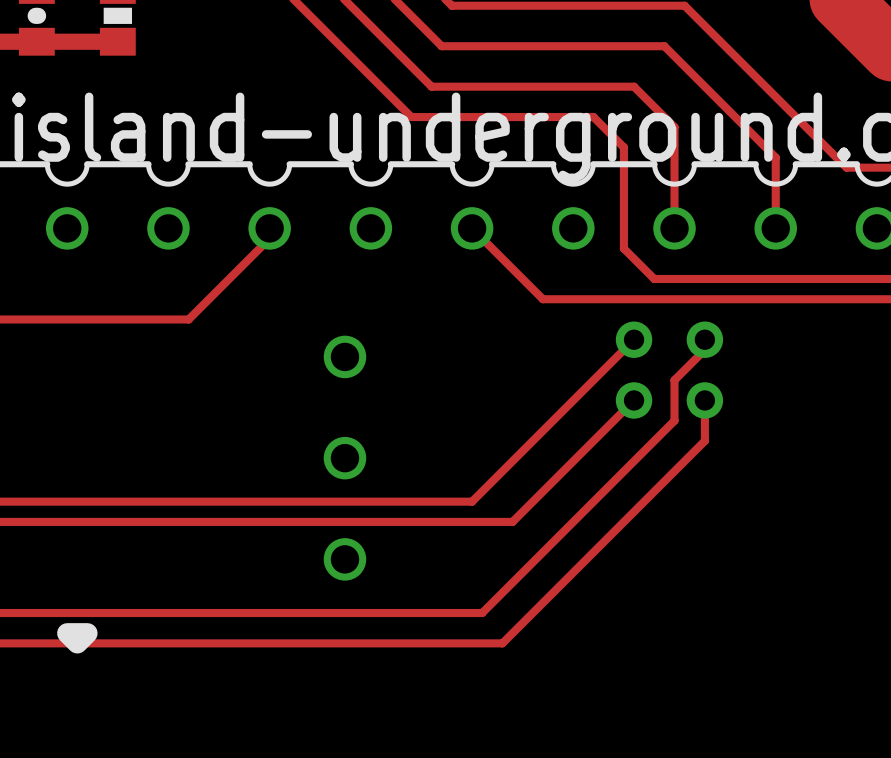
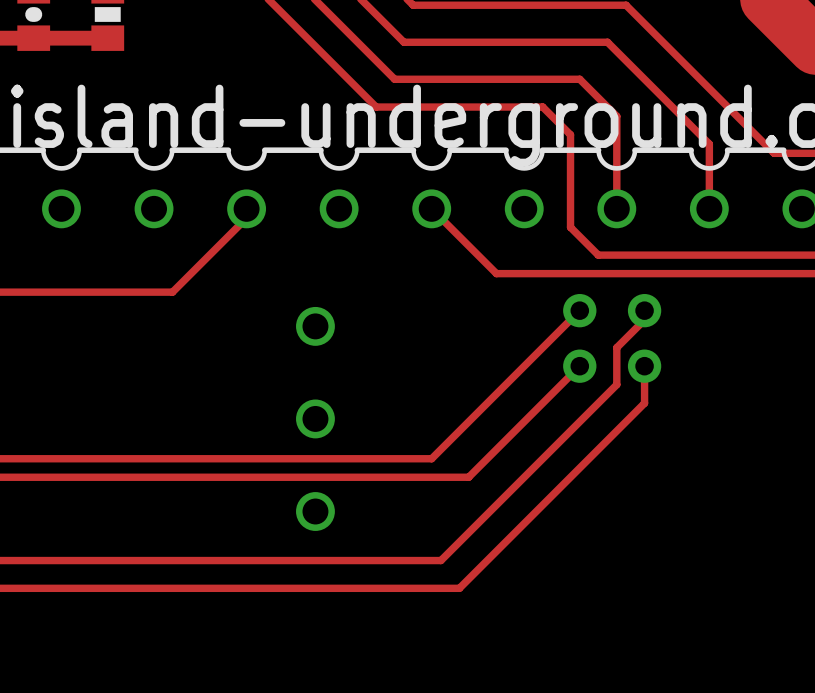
drawing: [57, 623, 98, 654] -> none

